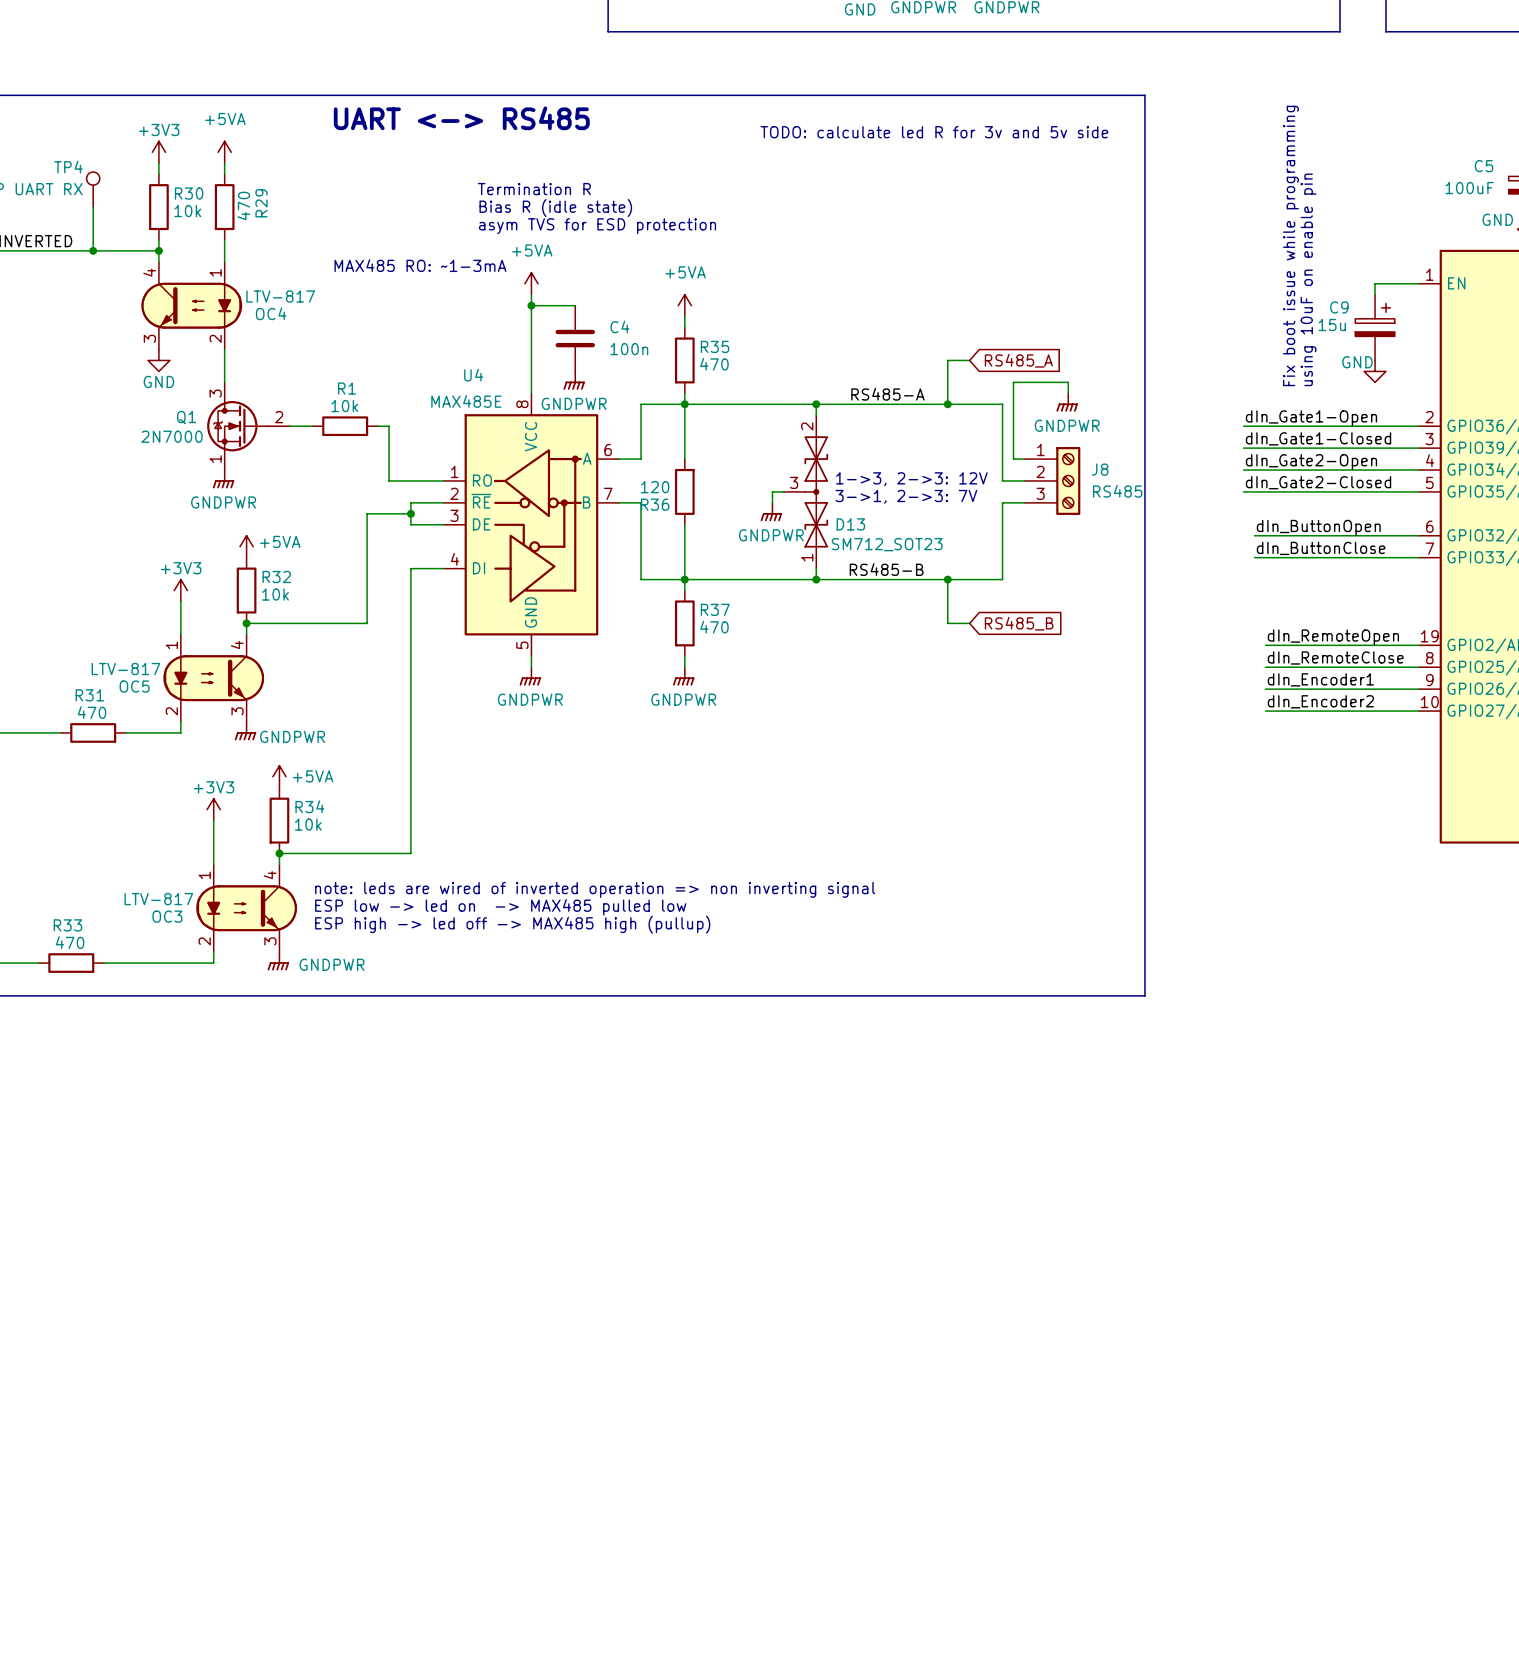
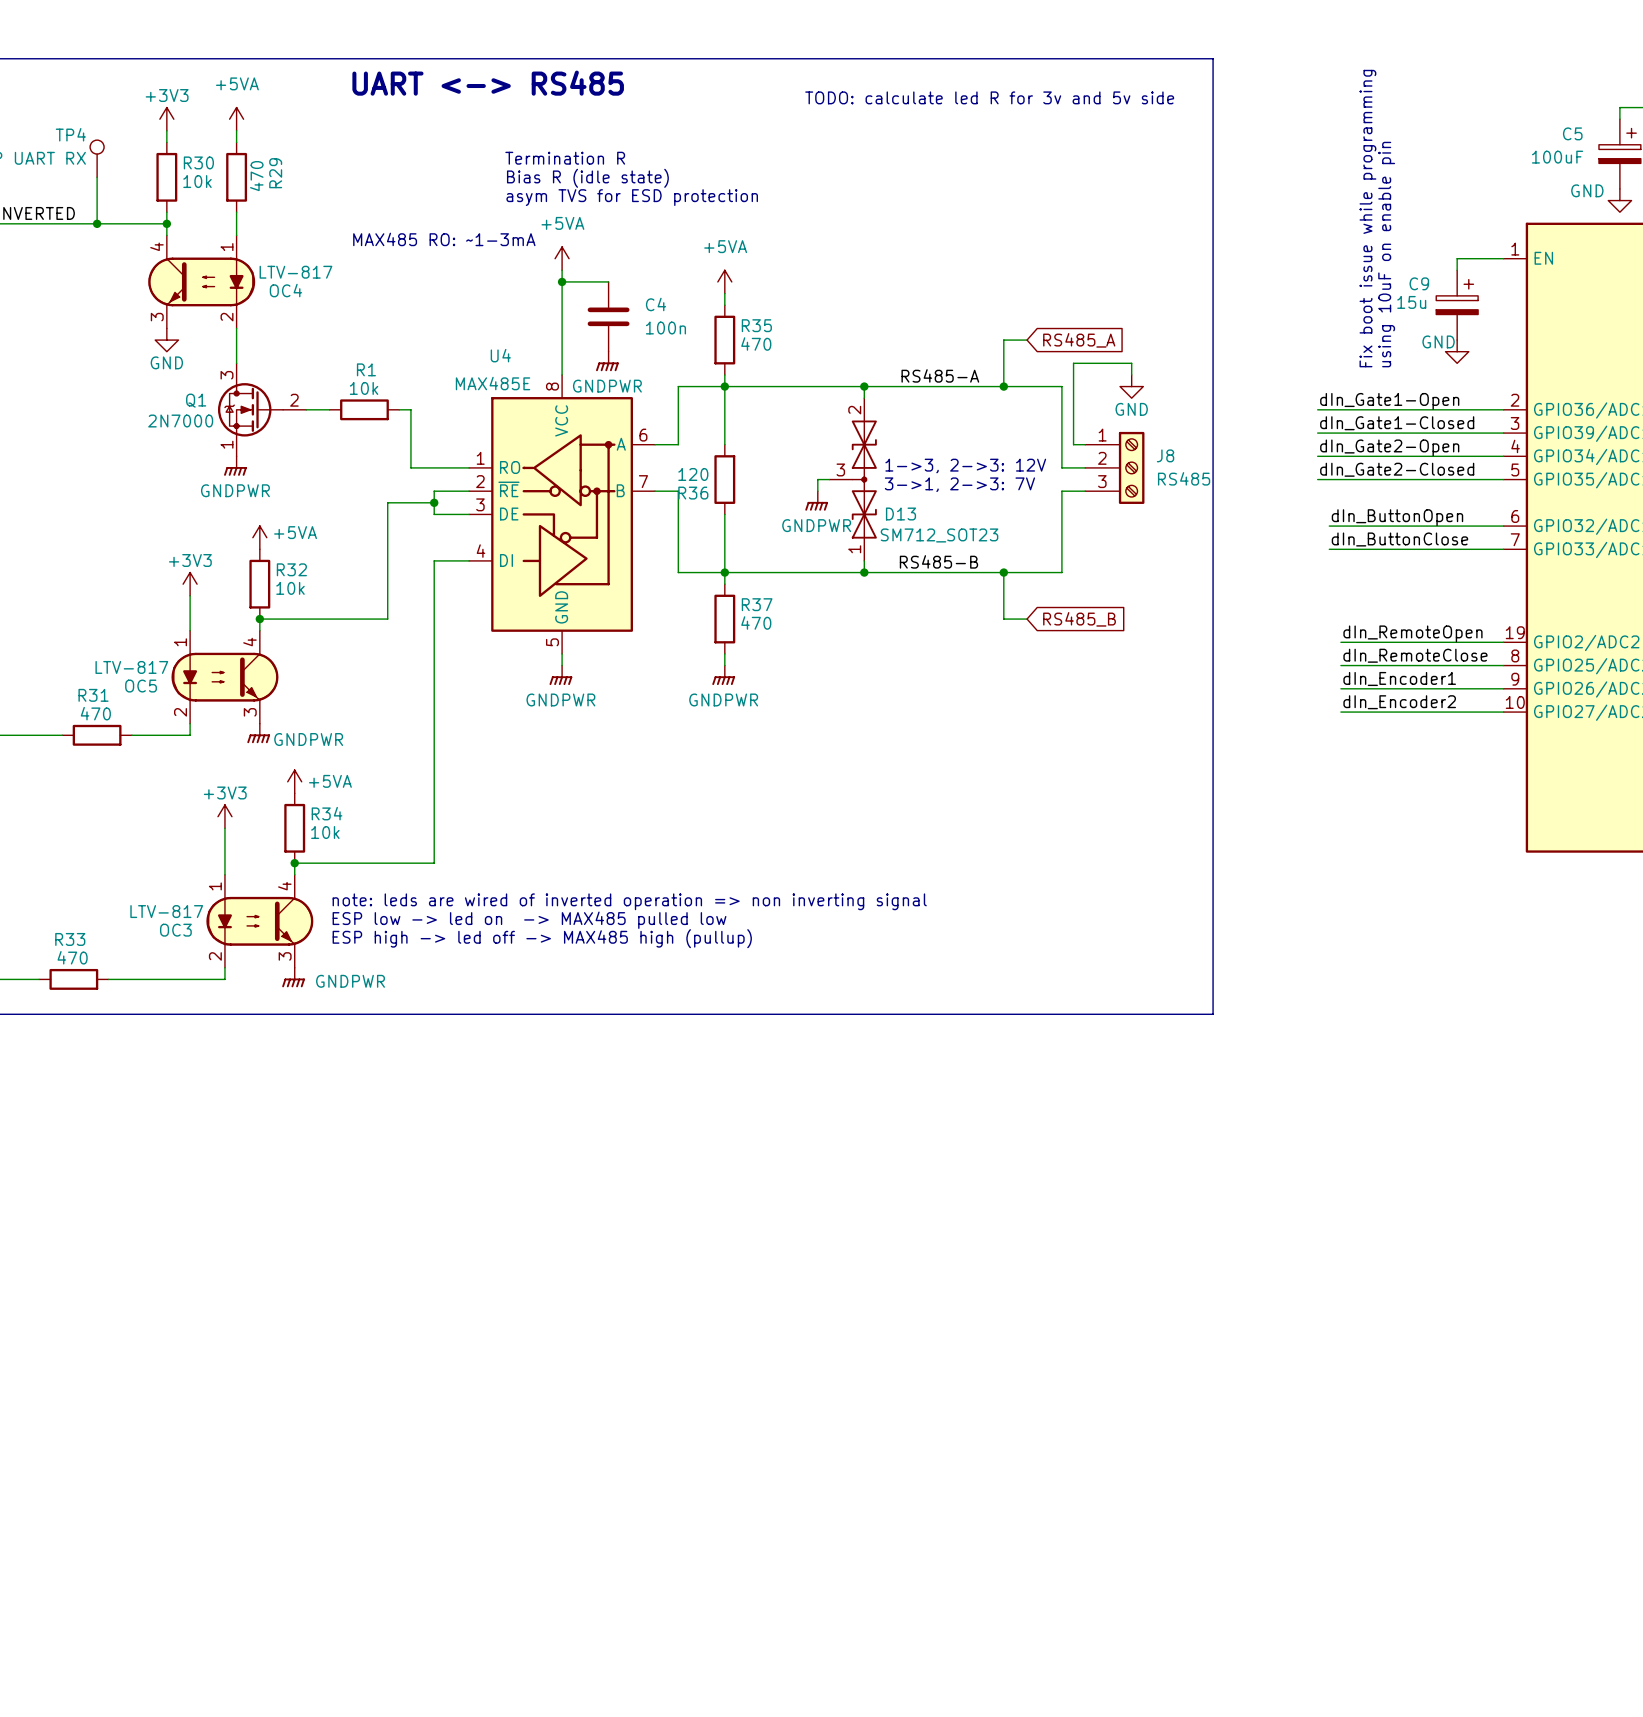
power symbol: GNDPWR (1067, 402) -> GND (1131, 386)

